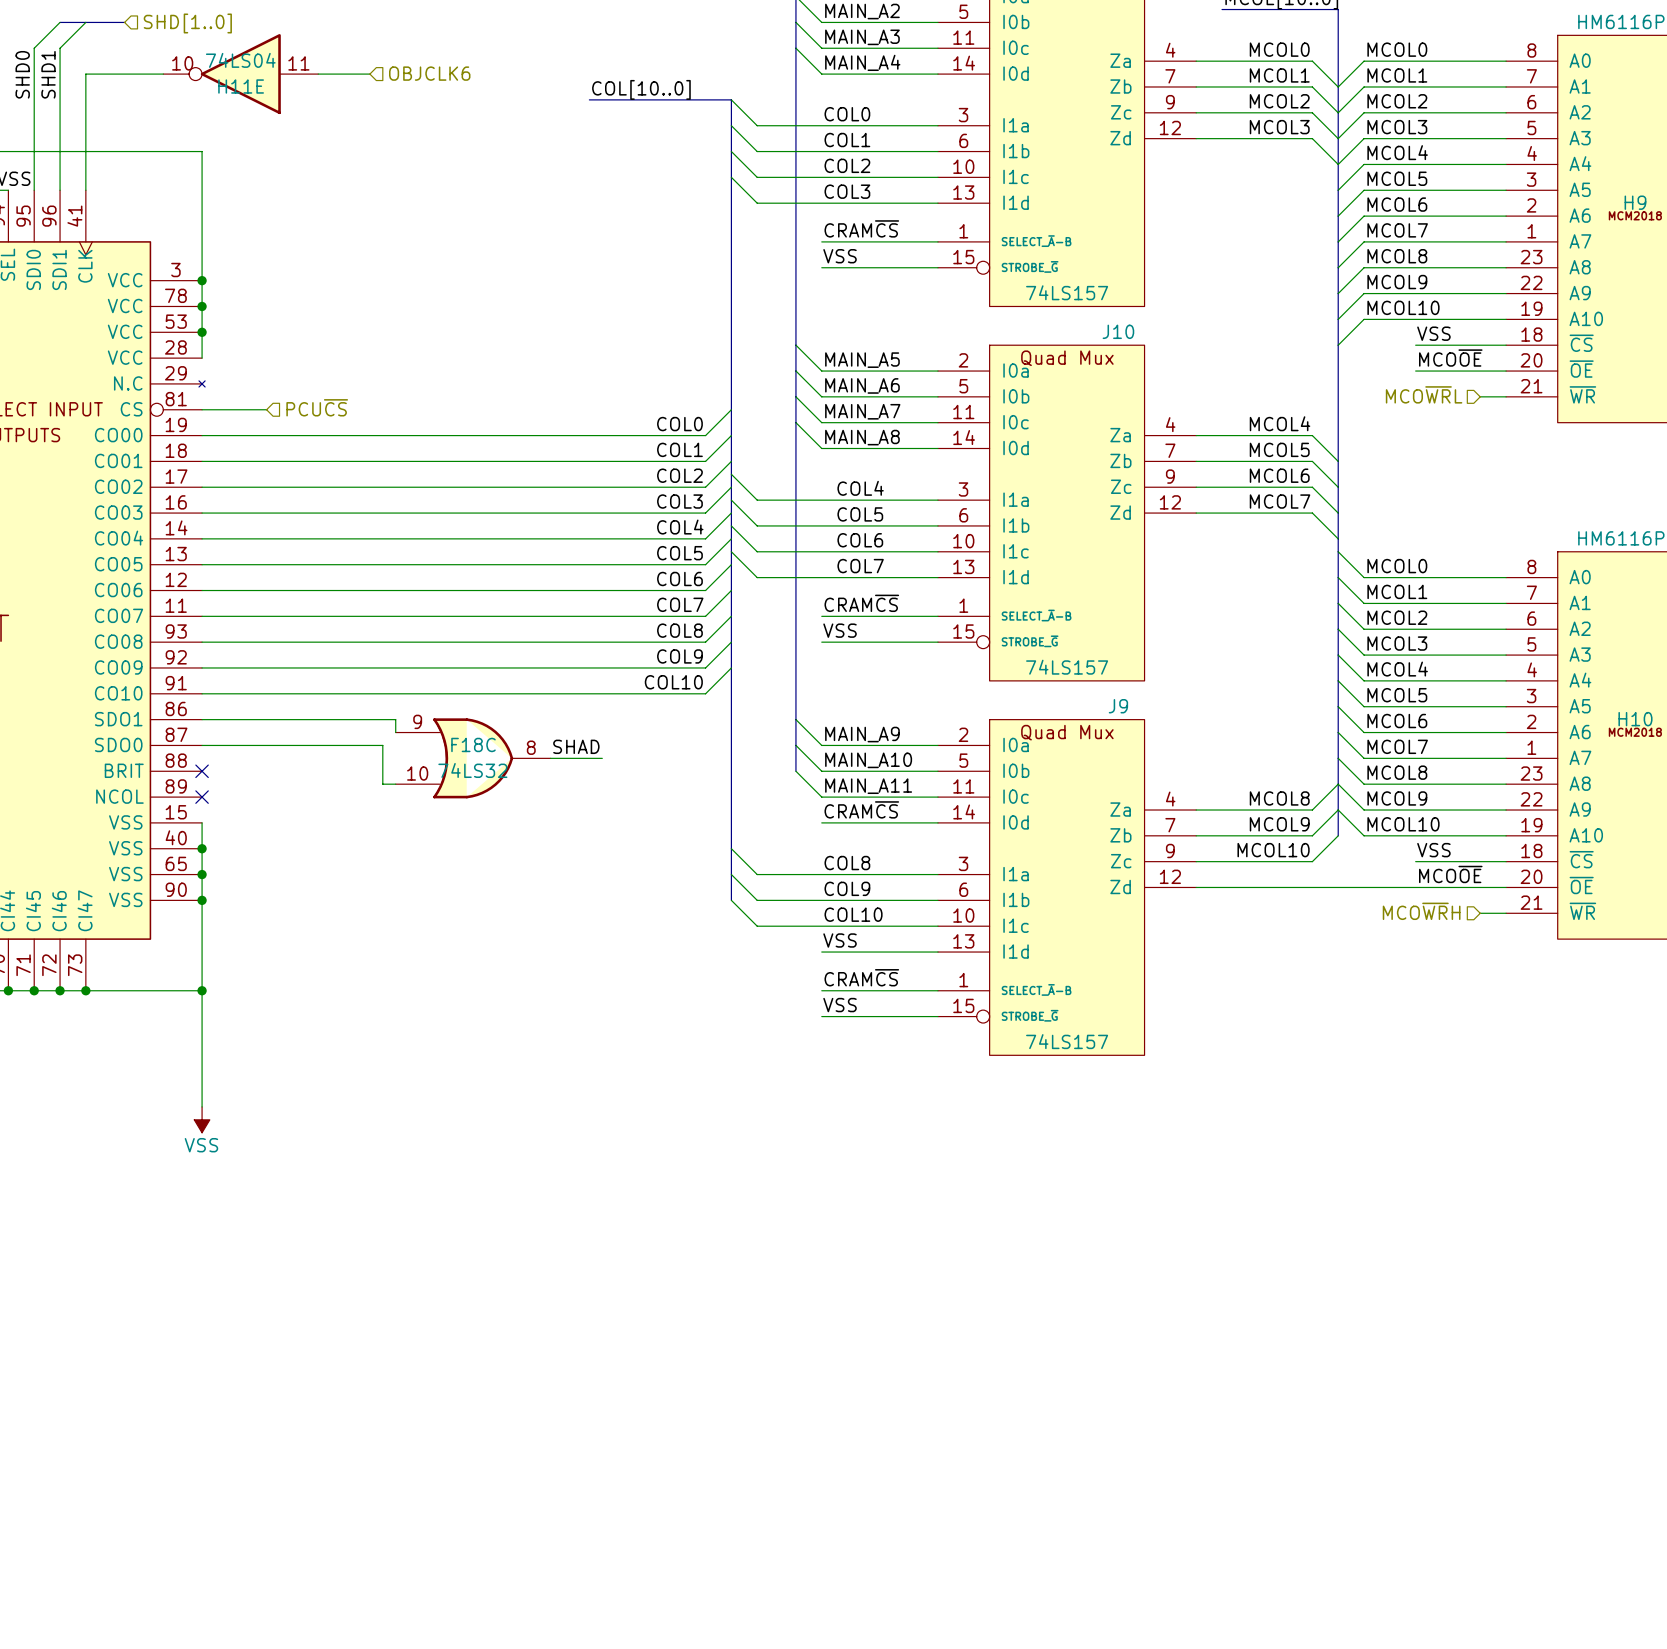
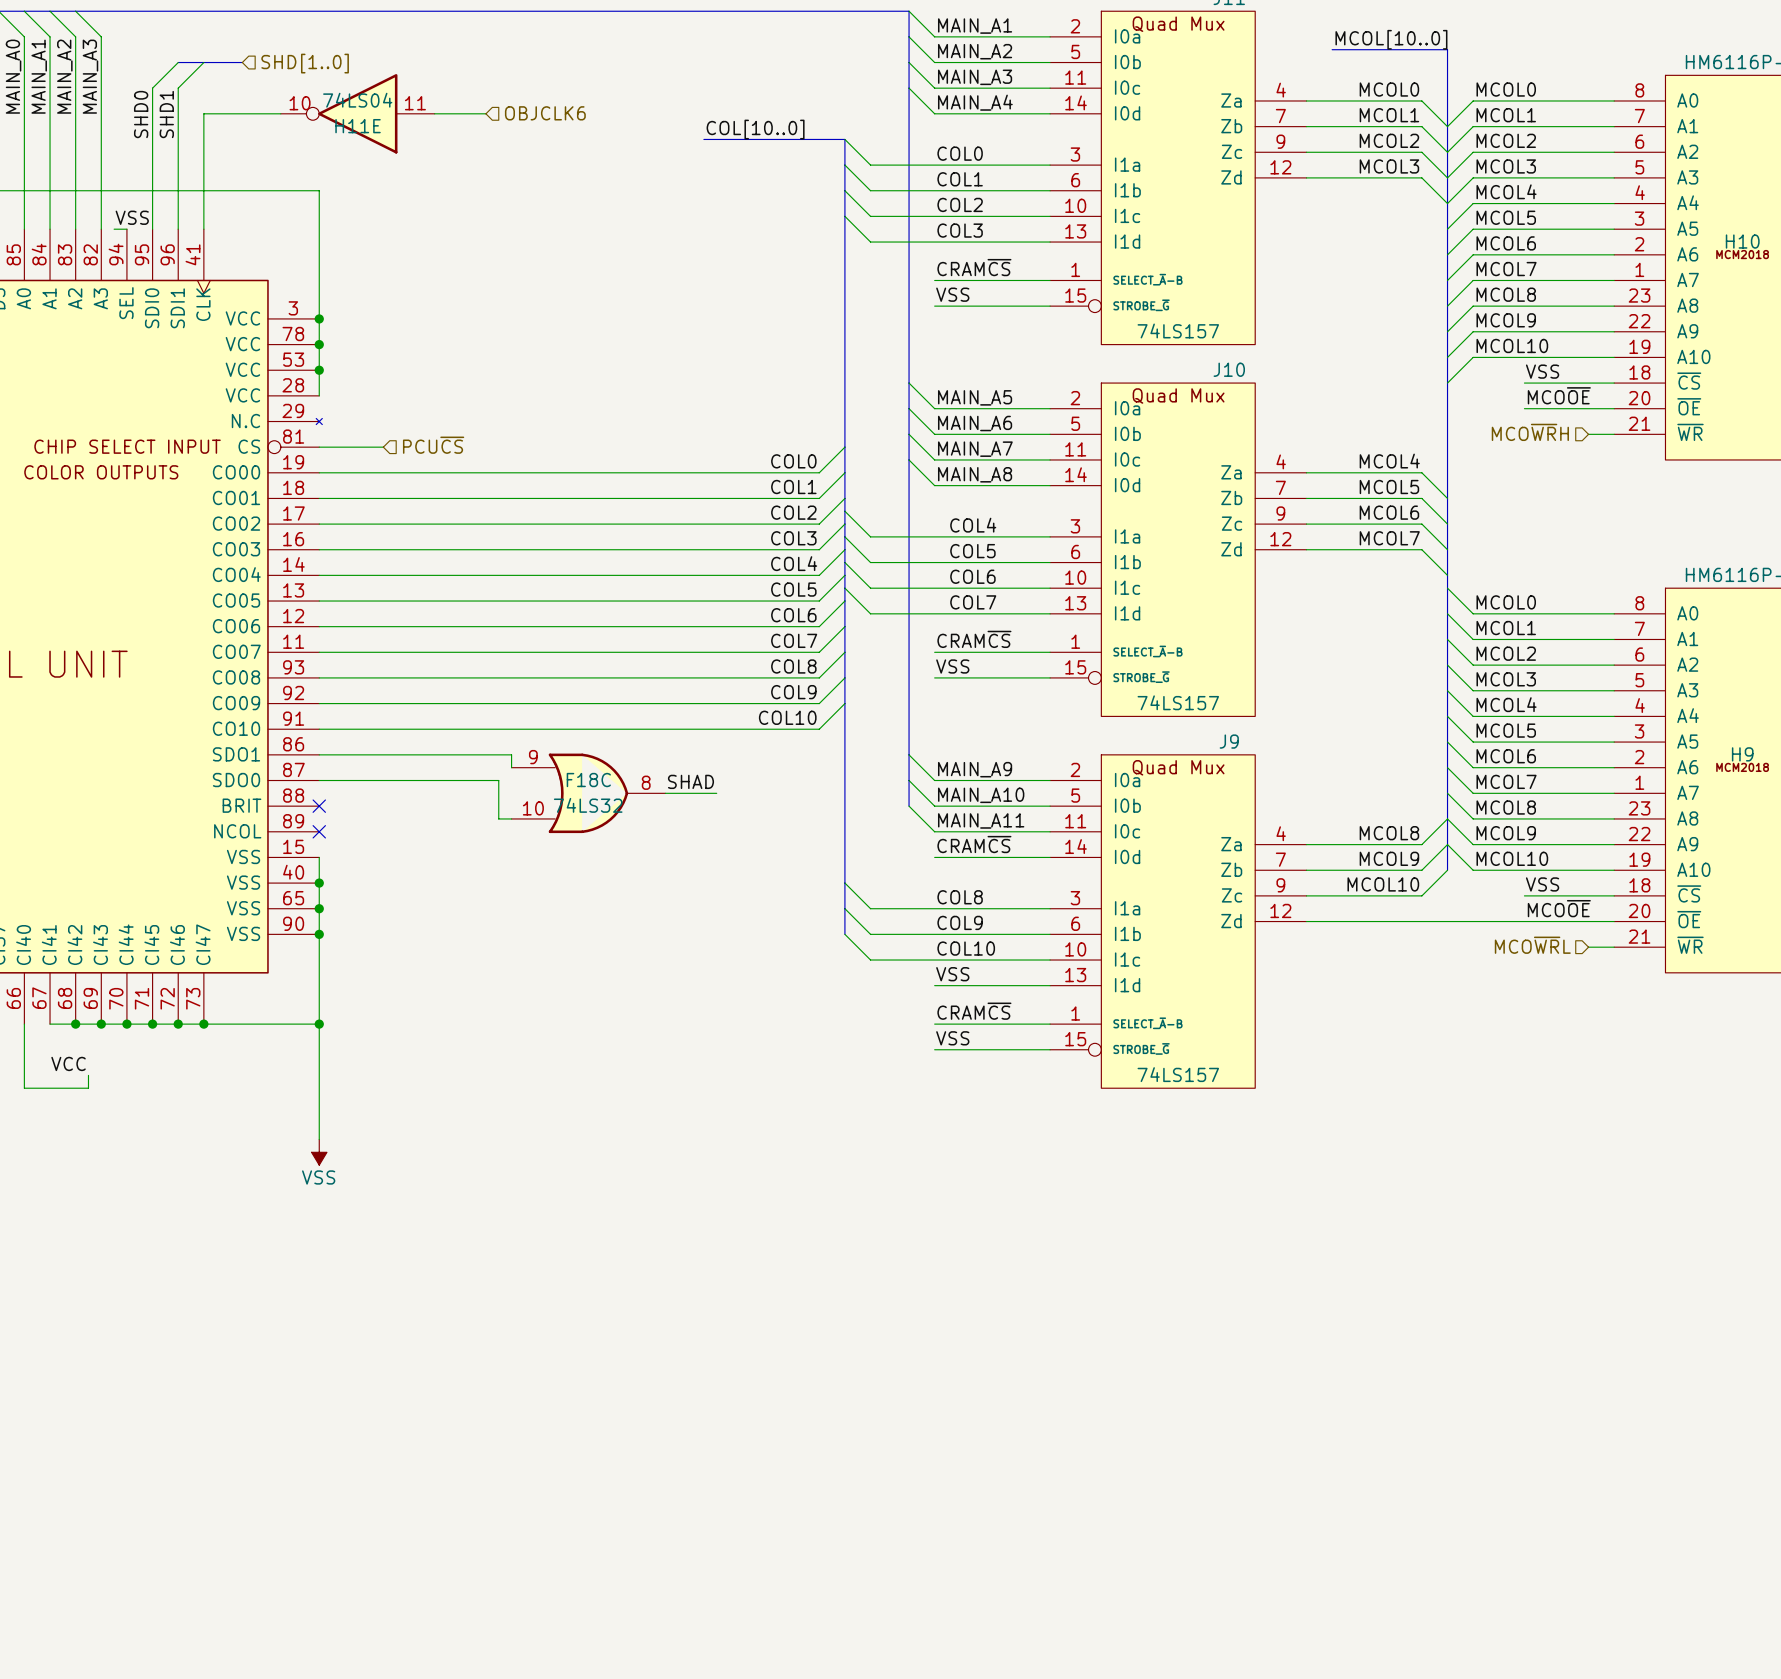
H9 name: H9 (1635, 202) -> H10 (1742, 241)
hierarchical label: MCO~{WR}L (1424, 394) -> MCO~{WR}H (1530, 432)
H10 name: H10 (1635, 719) -> H9 (1742, 754)
hierarchical label: MCO~{WR}H (1421, 911) -> MCO~{WR}L (1532, 945)

